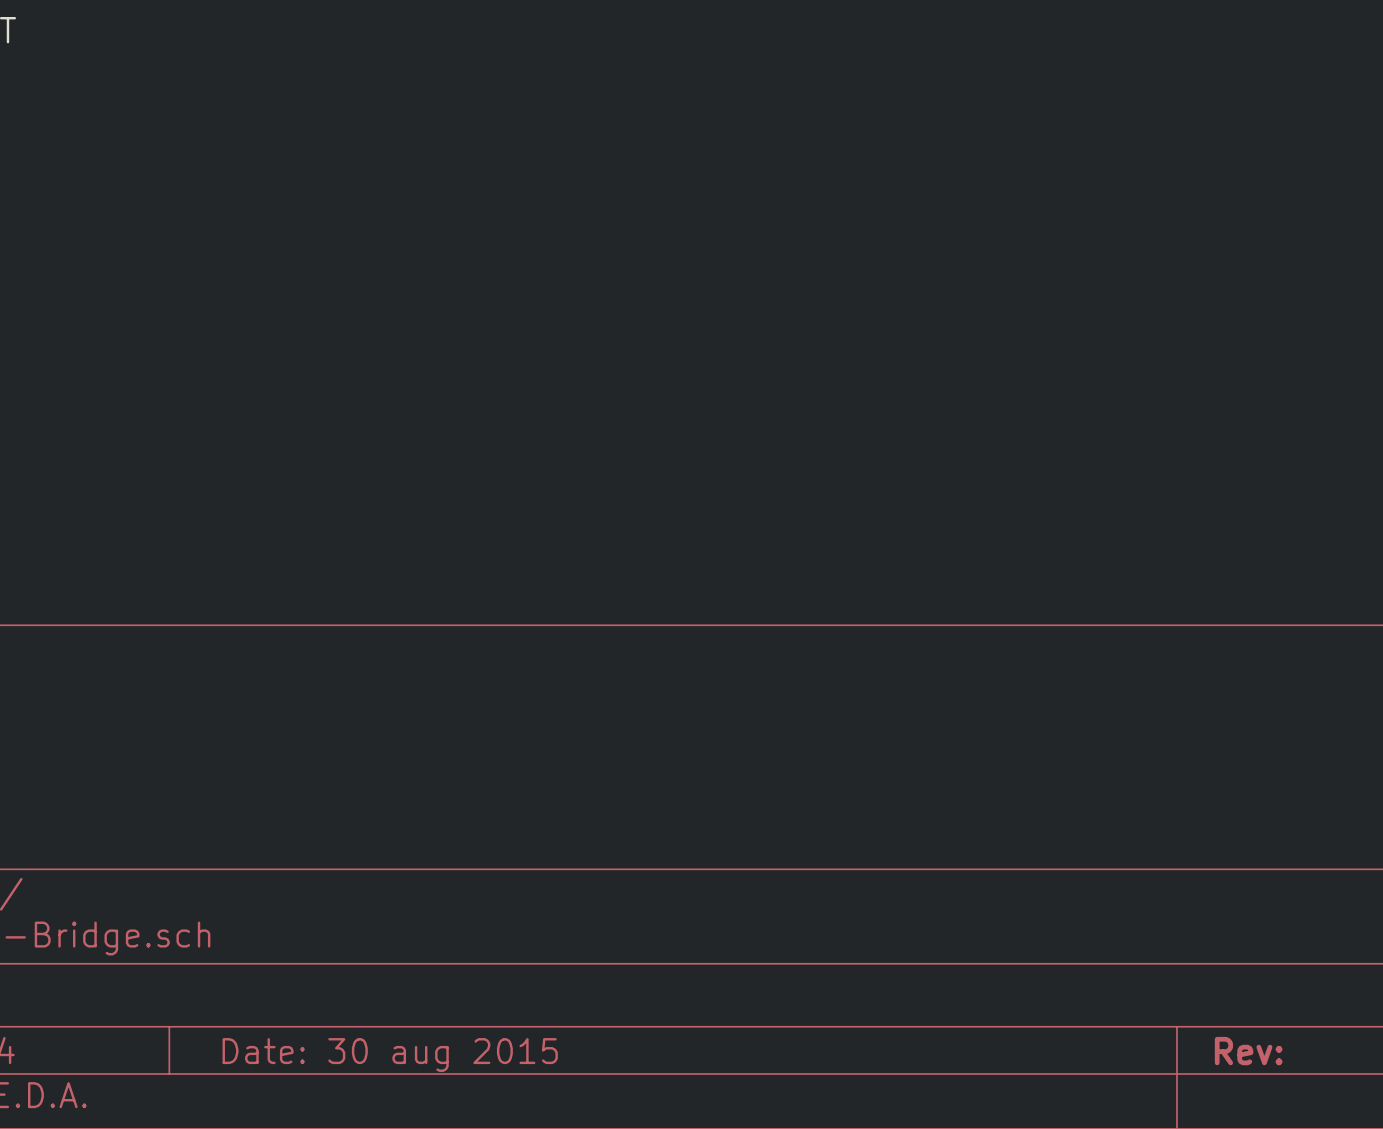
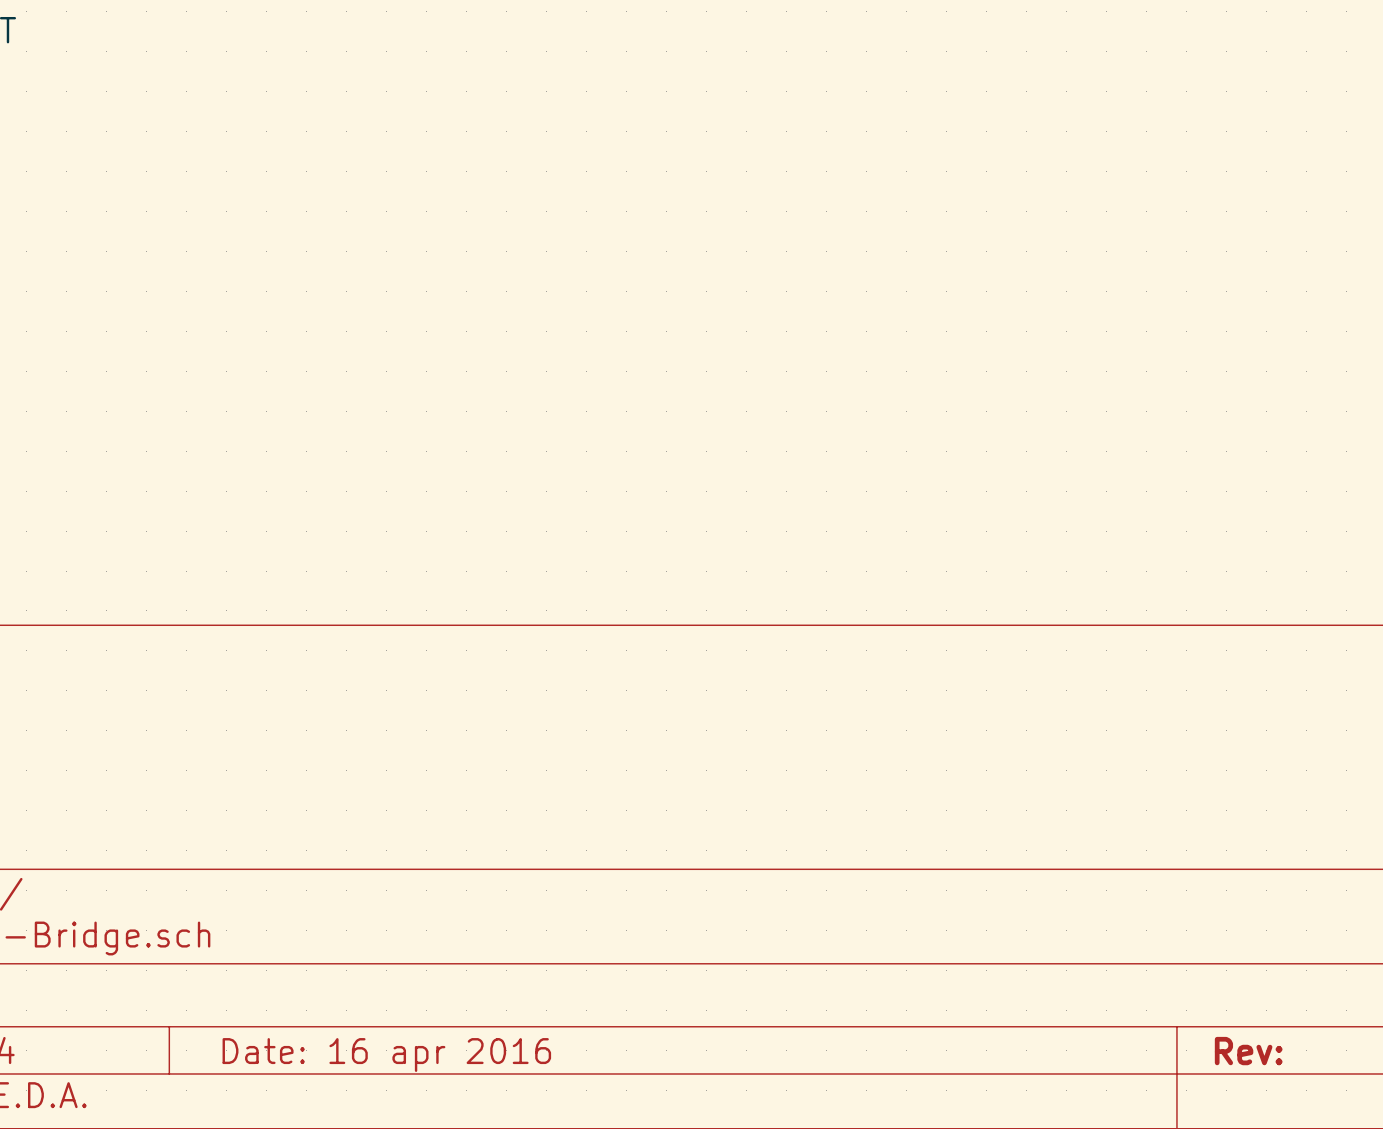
title block: Date: 30 aug 2015 (390, 1055) -> Date: 16 apr 2016 (386, 1055)

